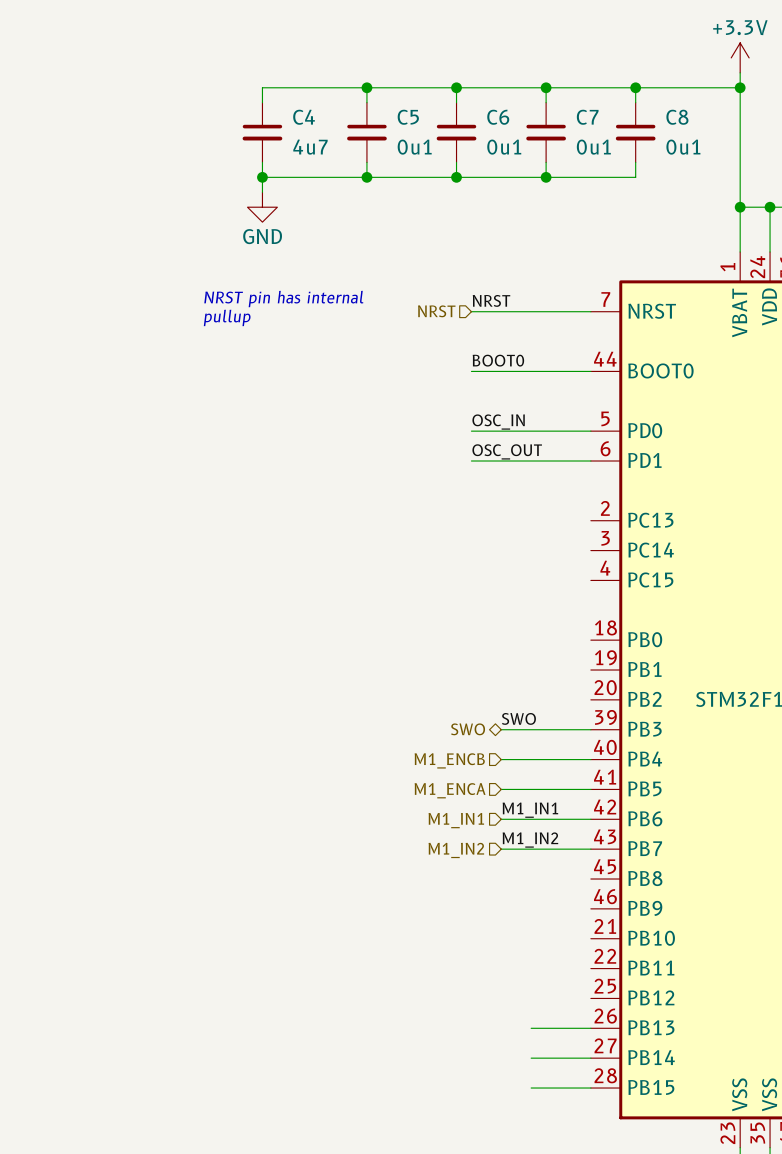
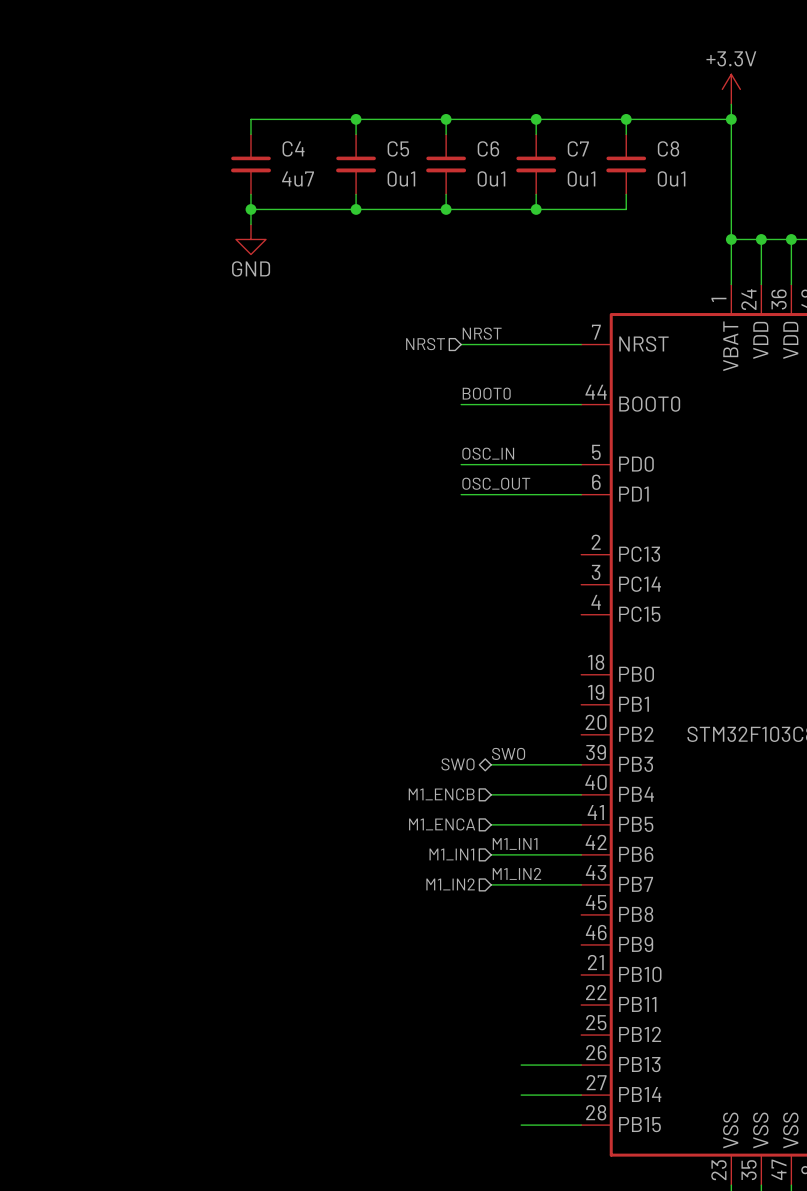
text: NRST pin has internal (283, 299) -> none
text: pullup (227, 317) -> none

